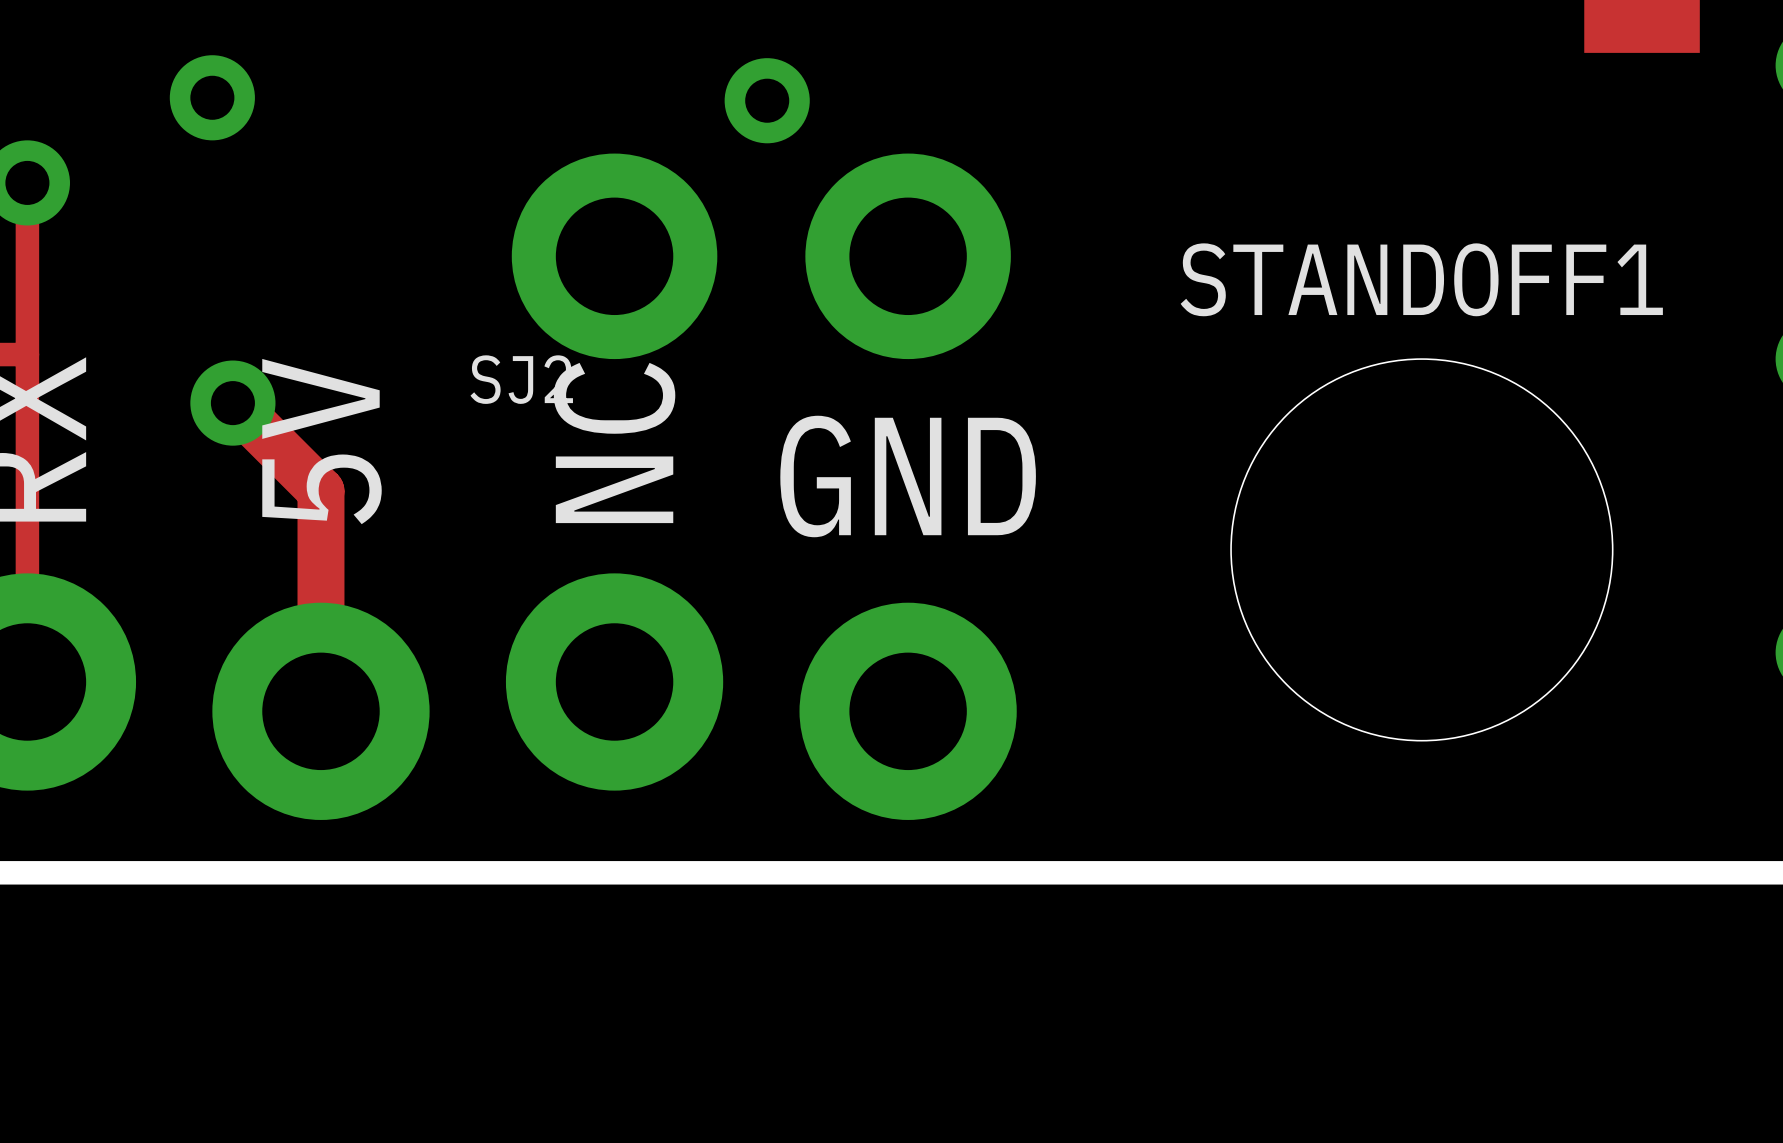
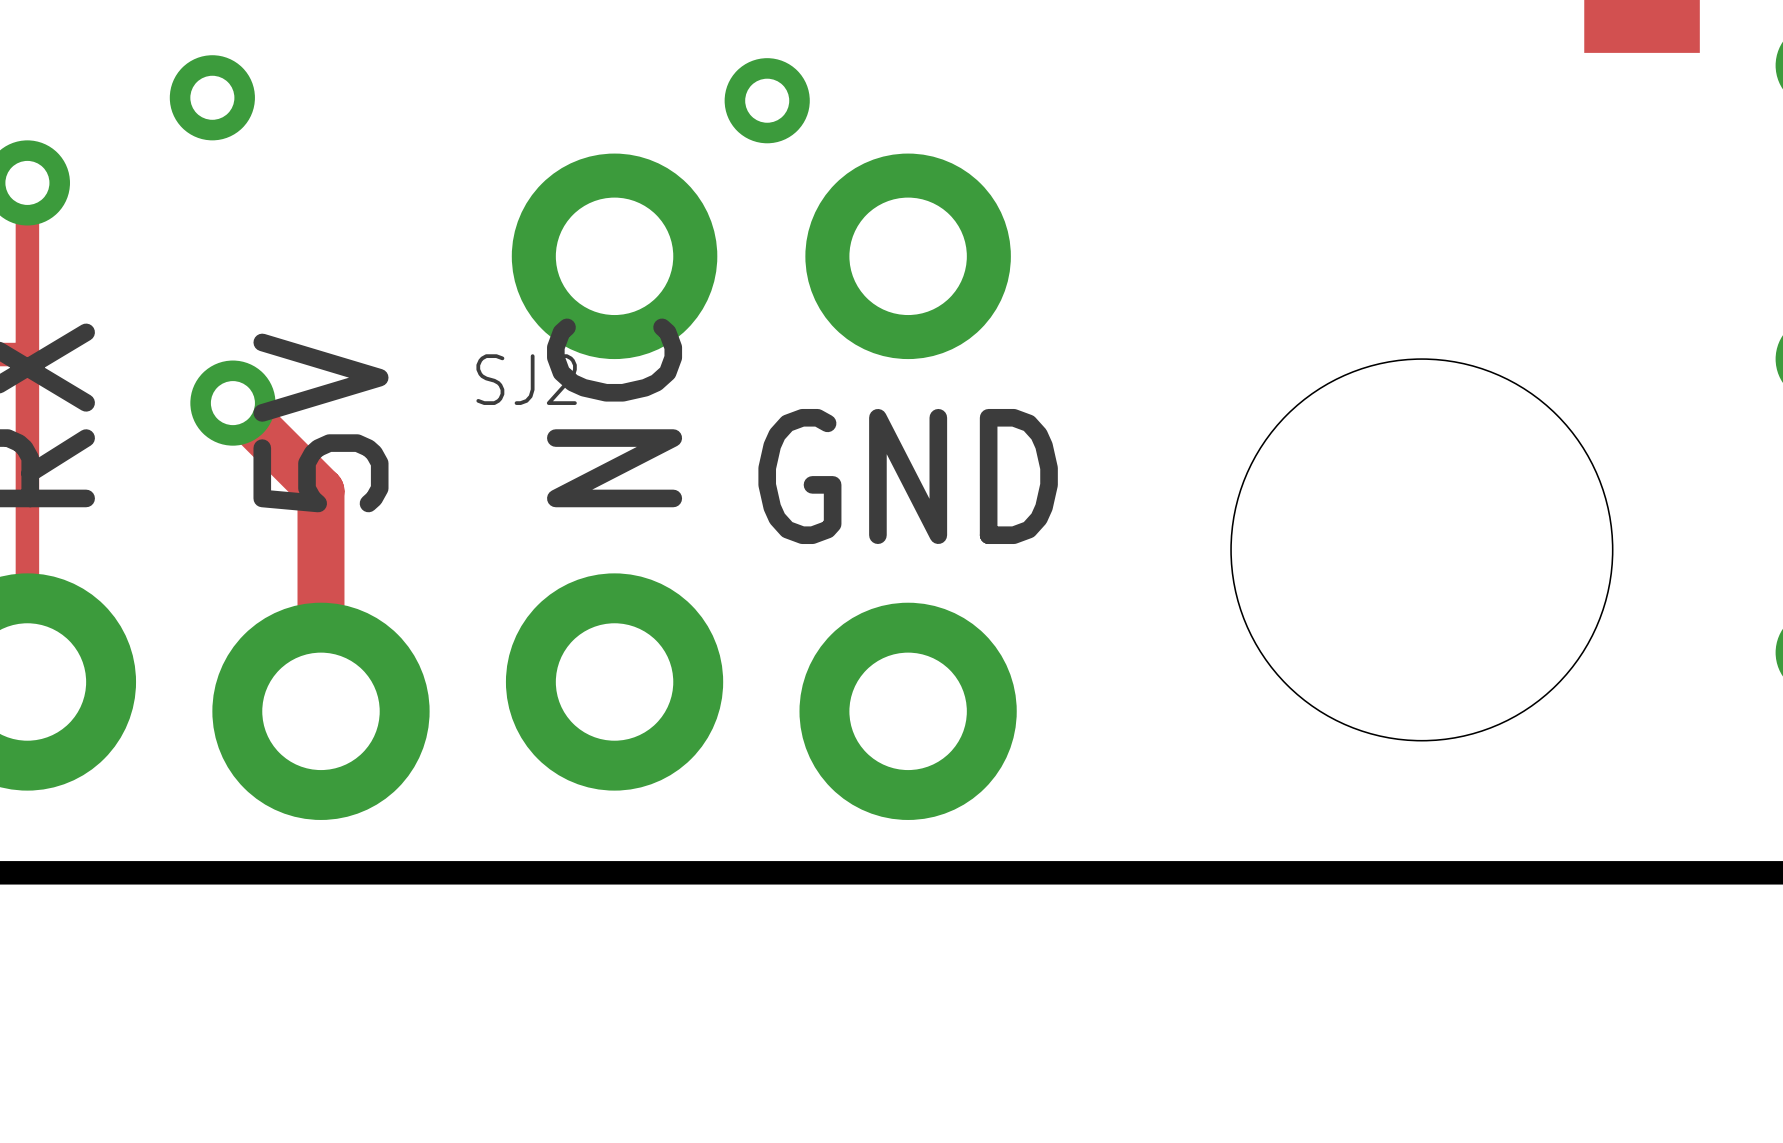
STANDOFF1 name: STANDOFF1 (1421, 279) -> none

